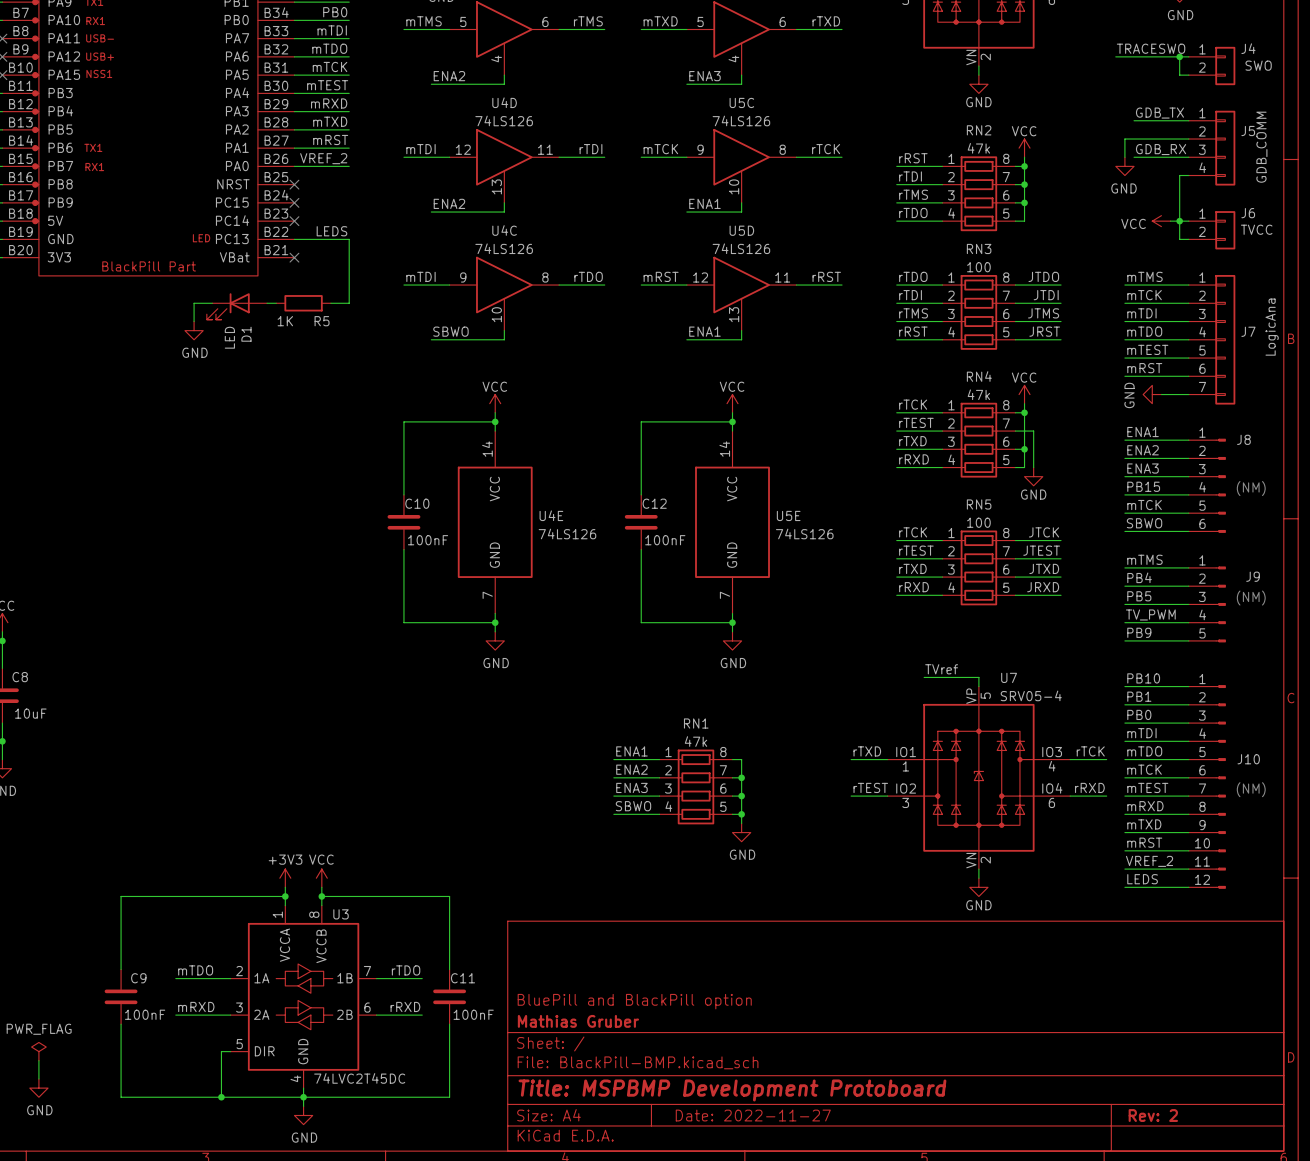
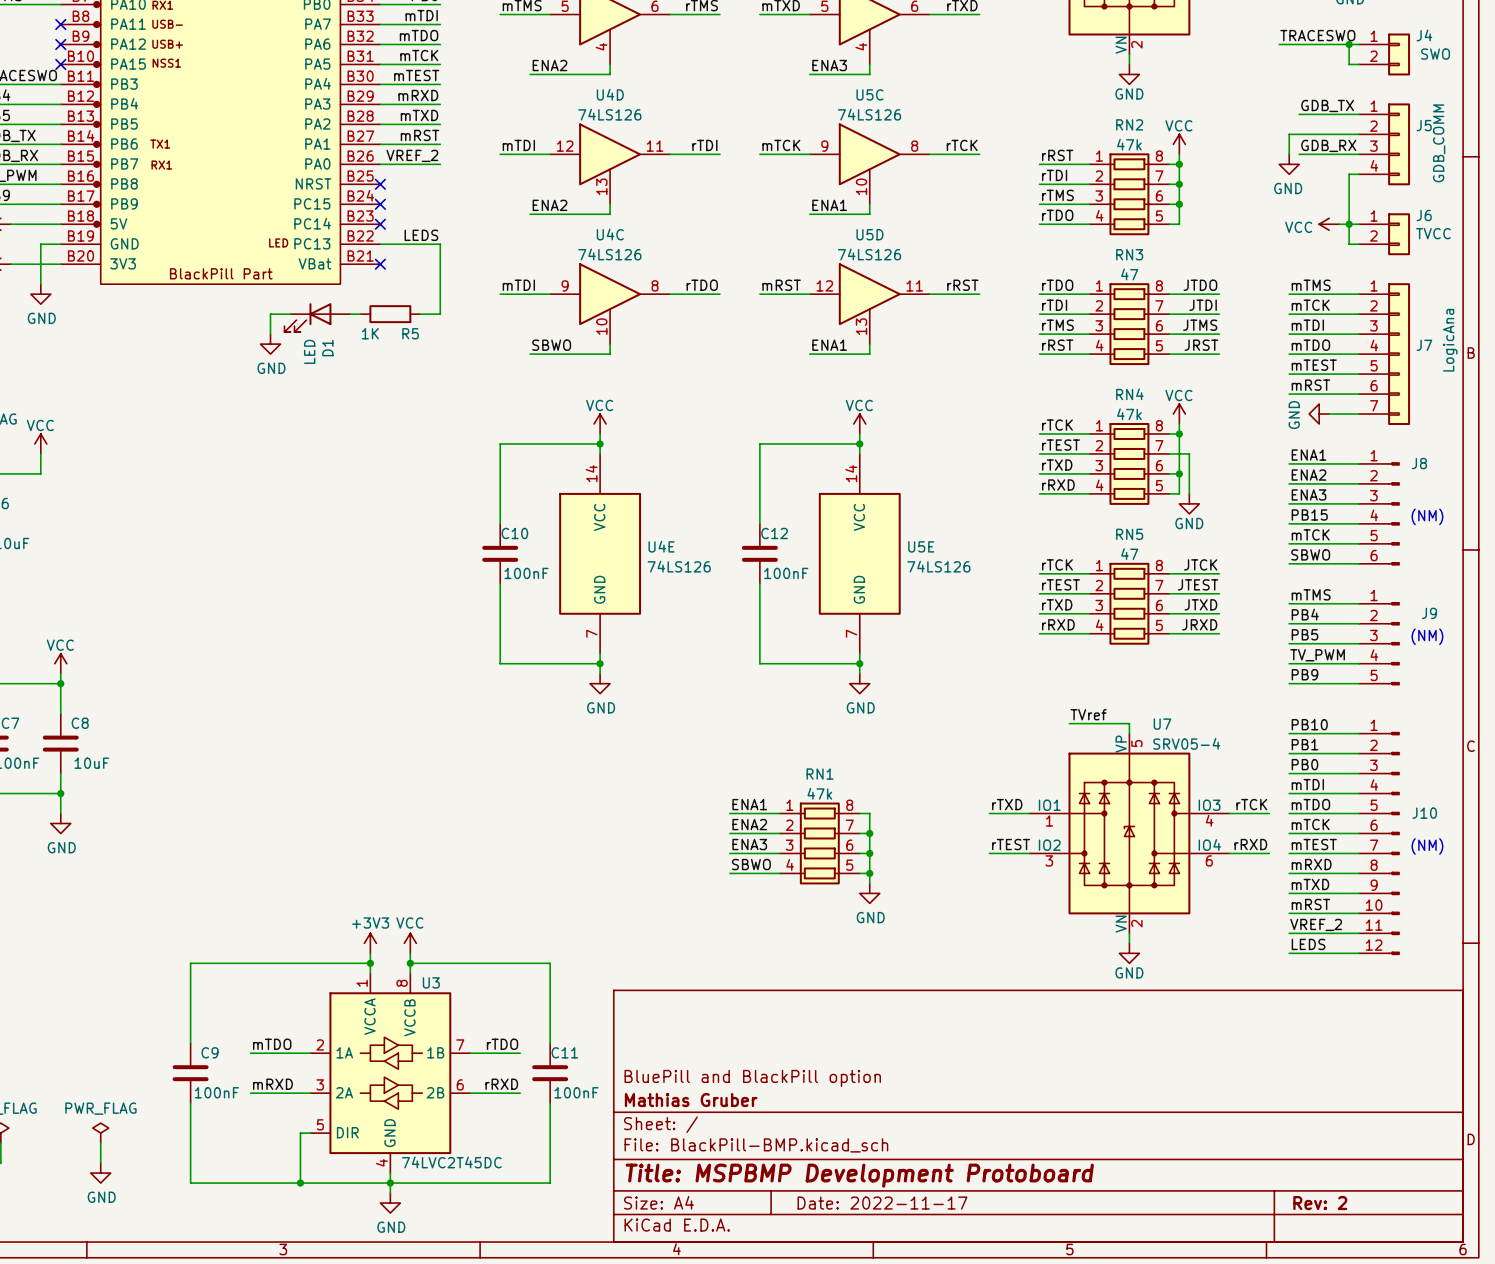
RN3 value: 100 (978, 267) -> 47 (1129, 274)
RN5 value: 100 (978, 522) -> 47 (1129, 554)
title block: Date: 2022-11-27 (753, 1115) -> Date: 2022-11-17 (882, 1203)

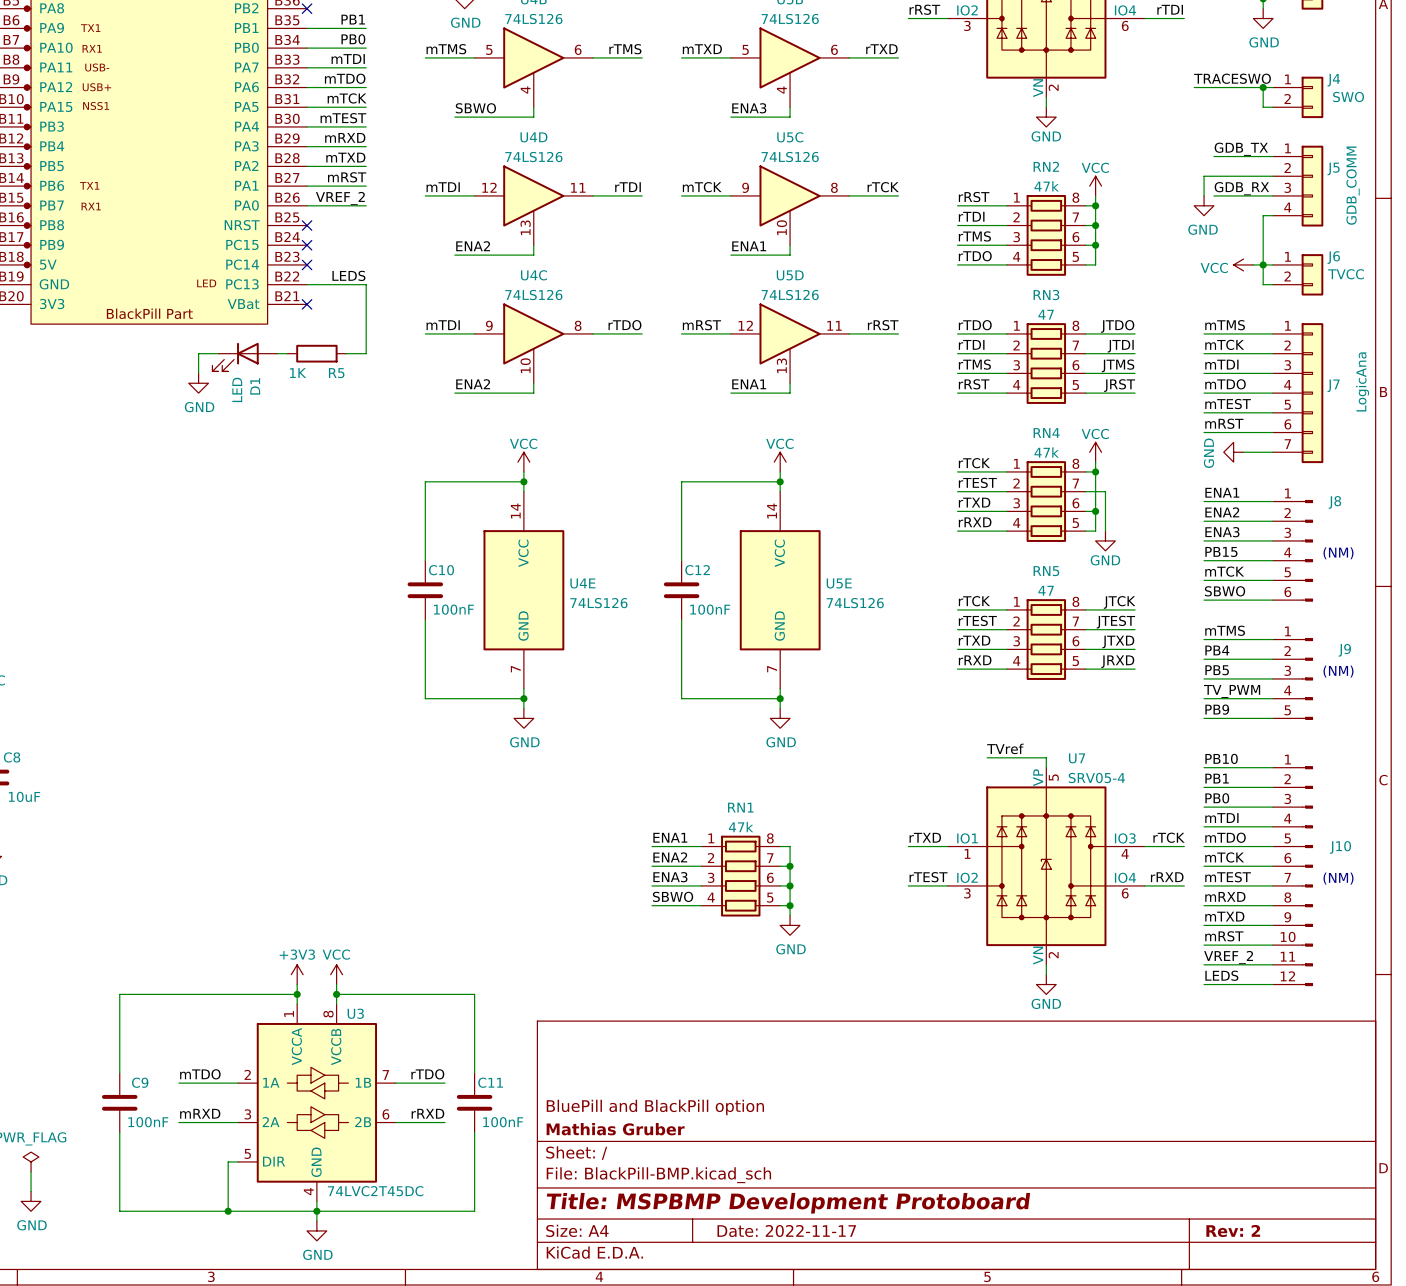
label: ENA2 (549, 65) -> SBWO (475, 108)
label: SBWO (551, 345) -> ENA2 (473, 384)

